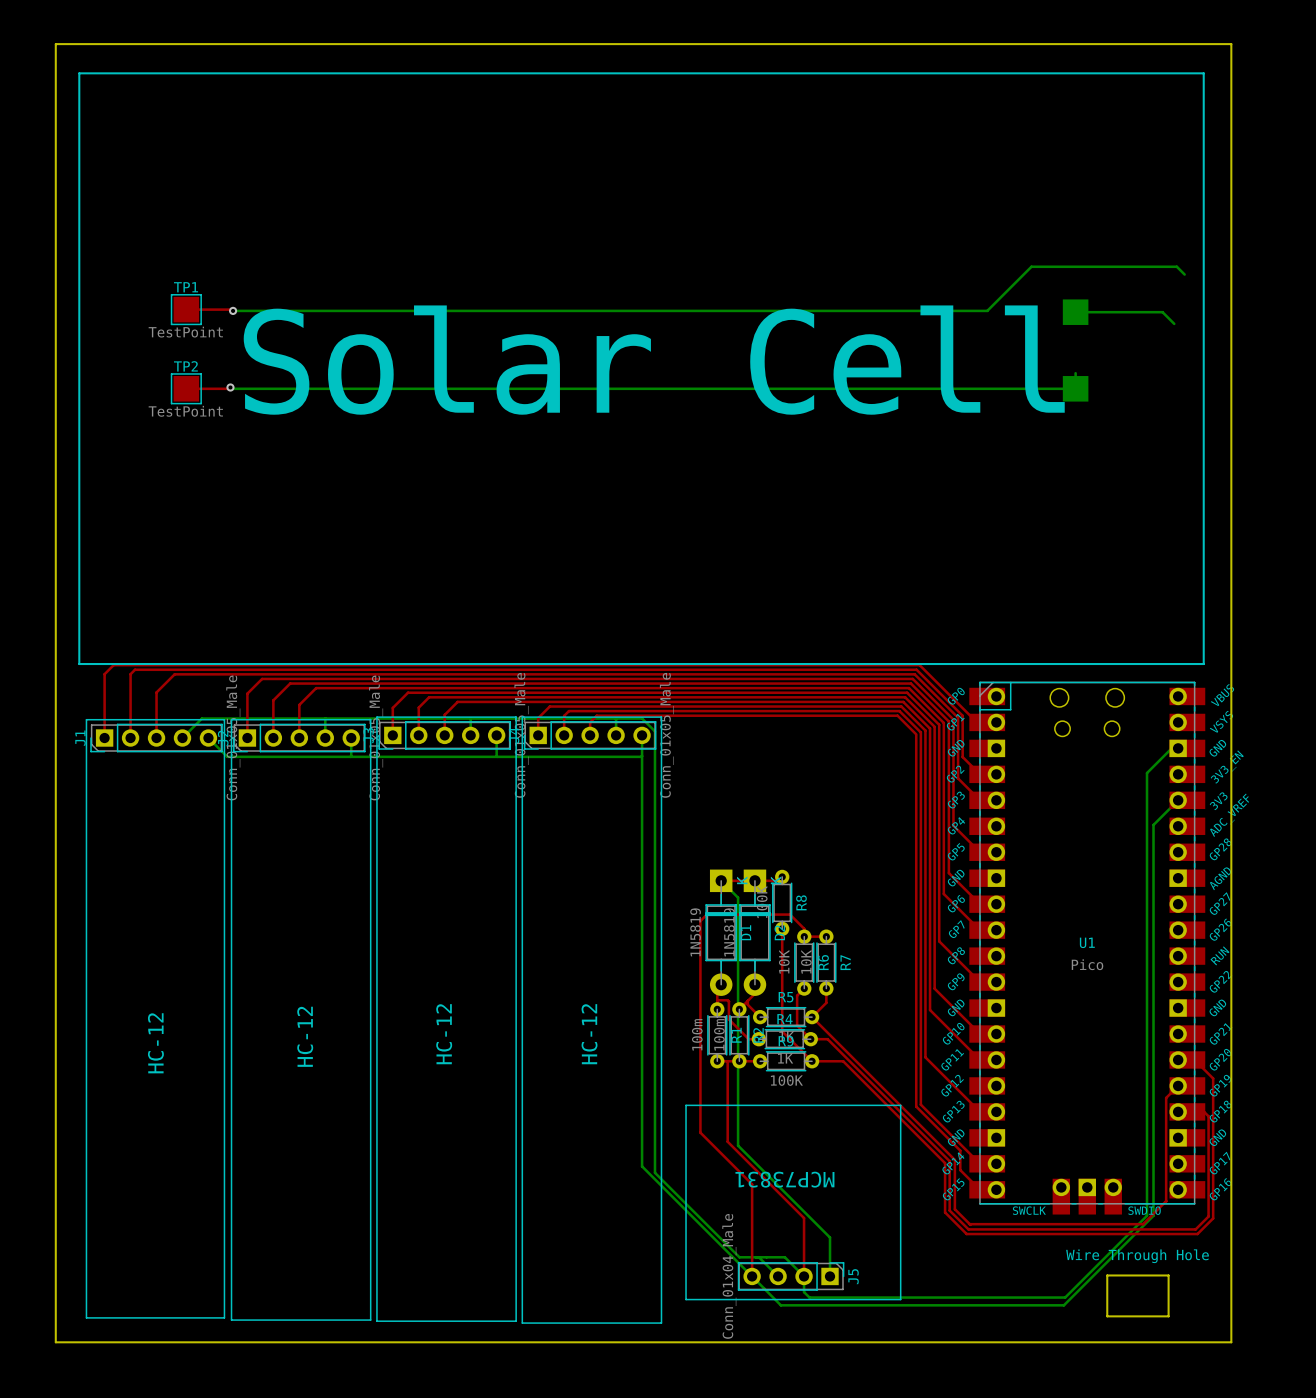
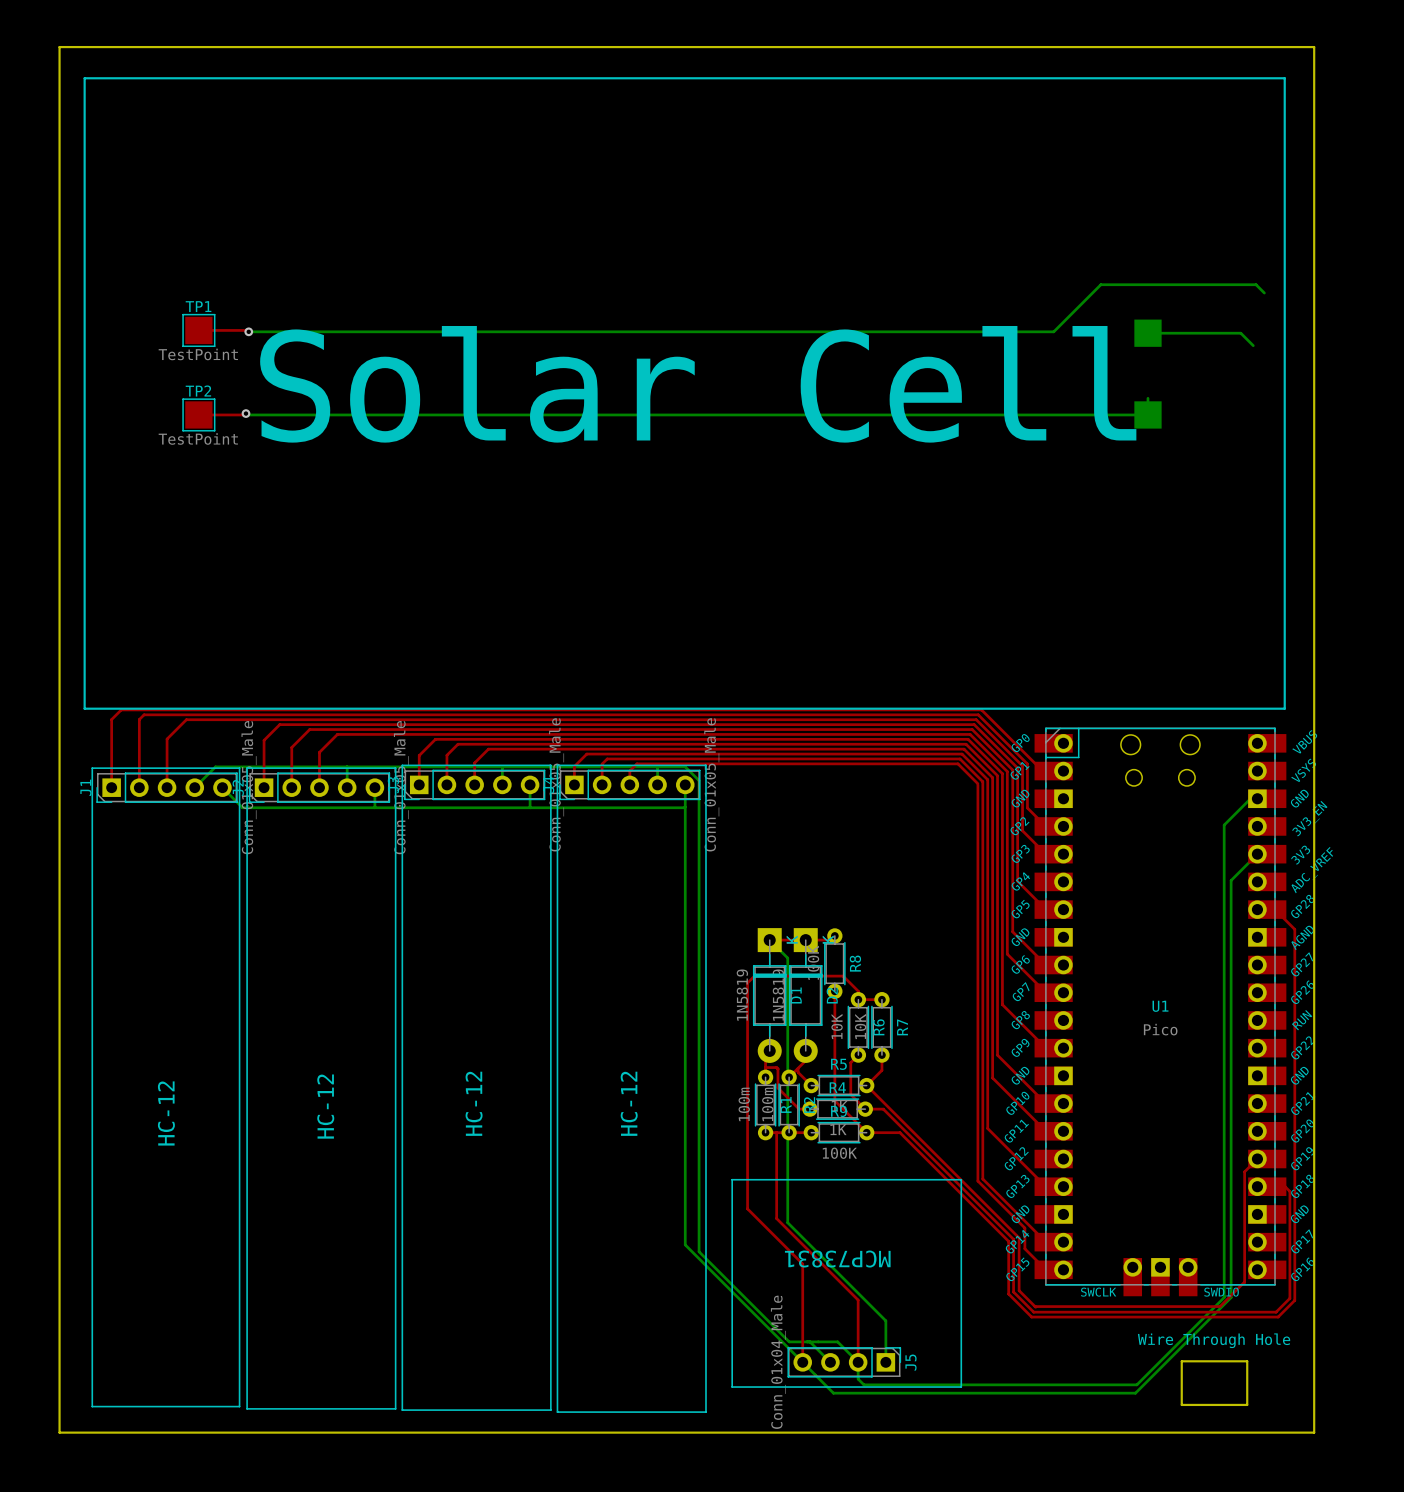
top track: (1194, 1059) (1213, 1078) -> (1257, 909) (1275, 909) (1294, 929) (1294, 1151)

